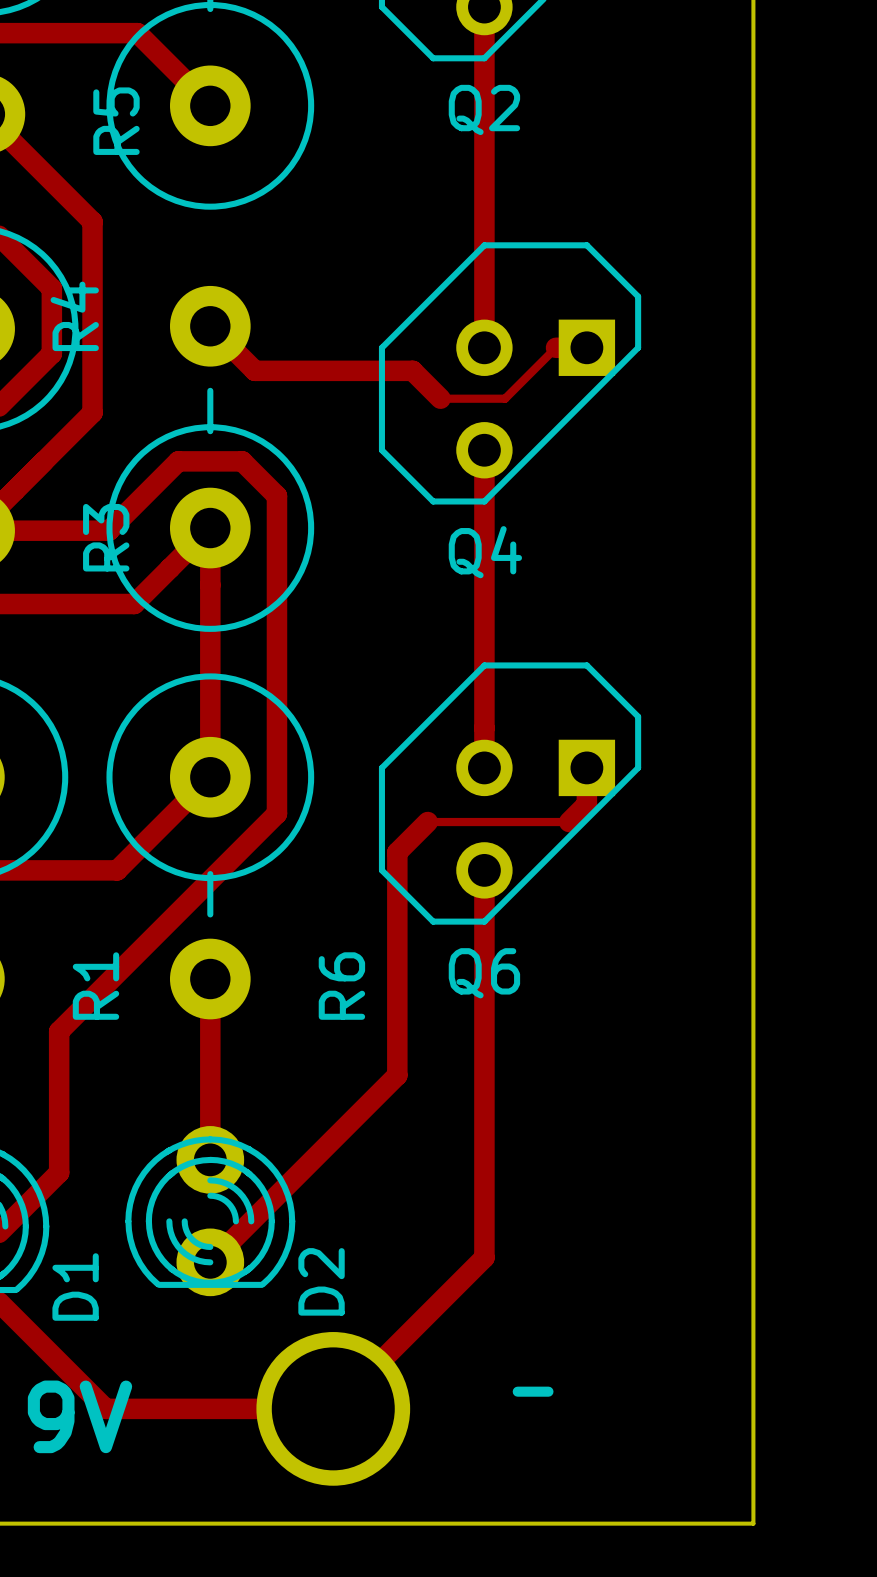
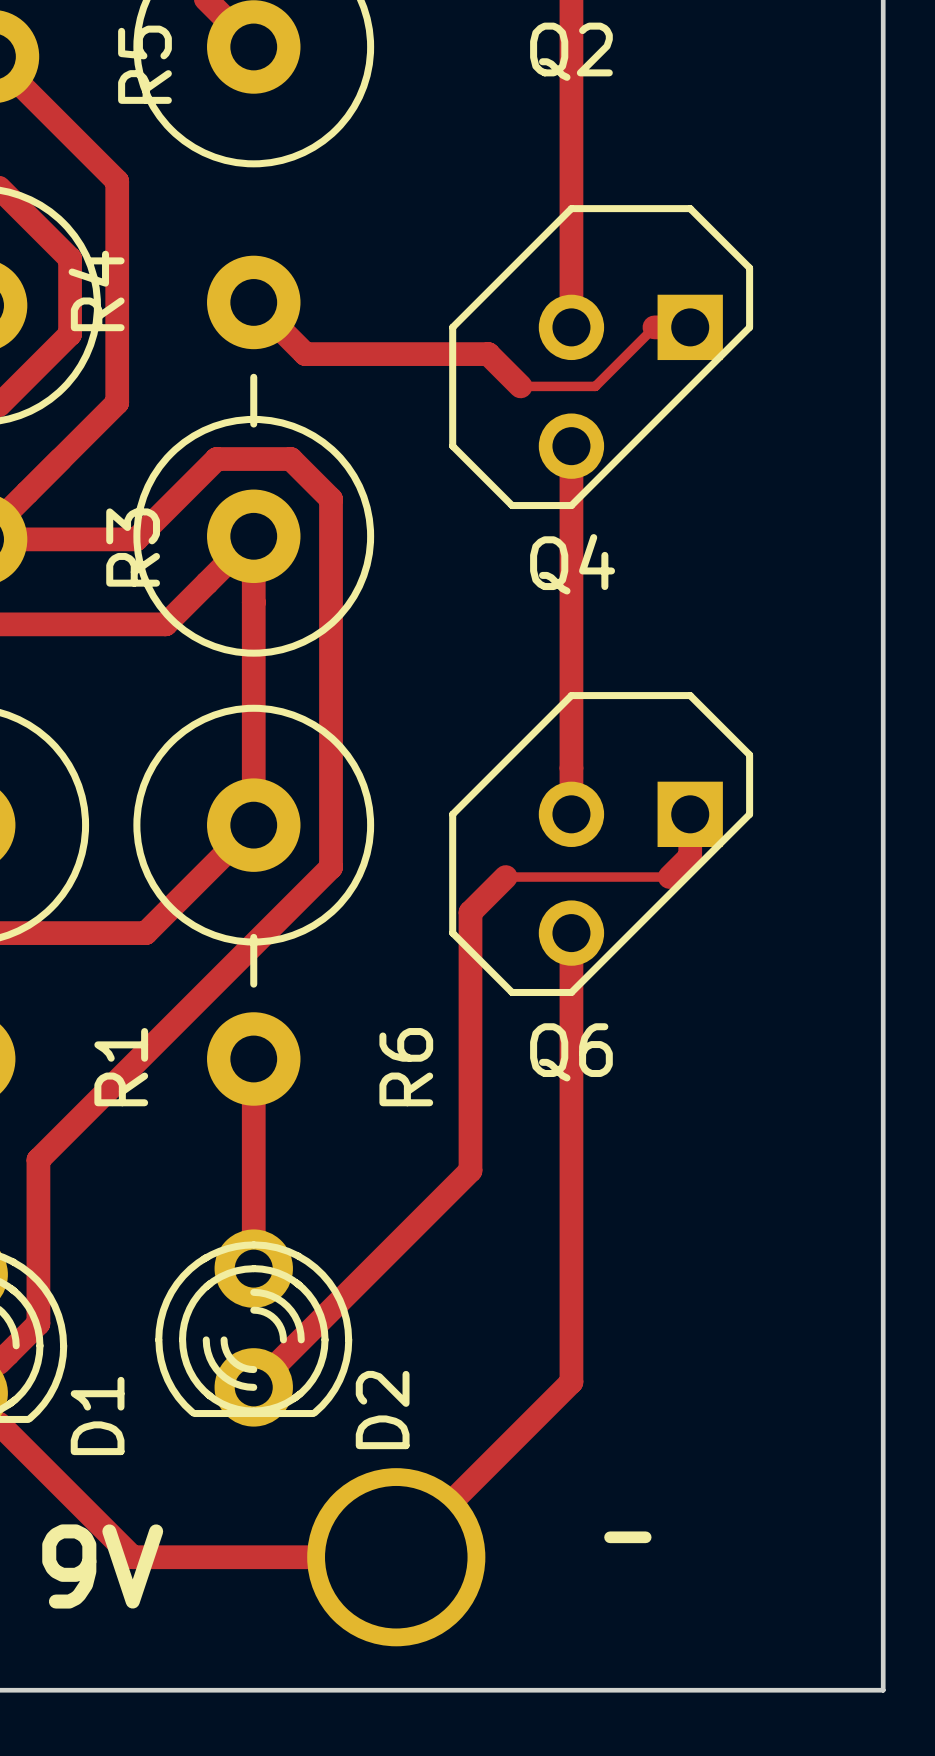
top track: (59, 1031) (59, 1172) (24, 1207) -> (78, 1119) (38, 1159) (38, 1323)

